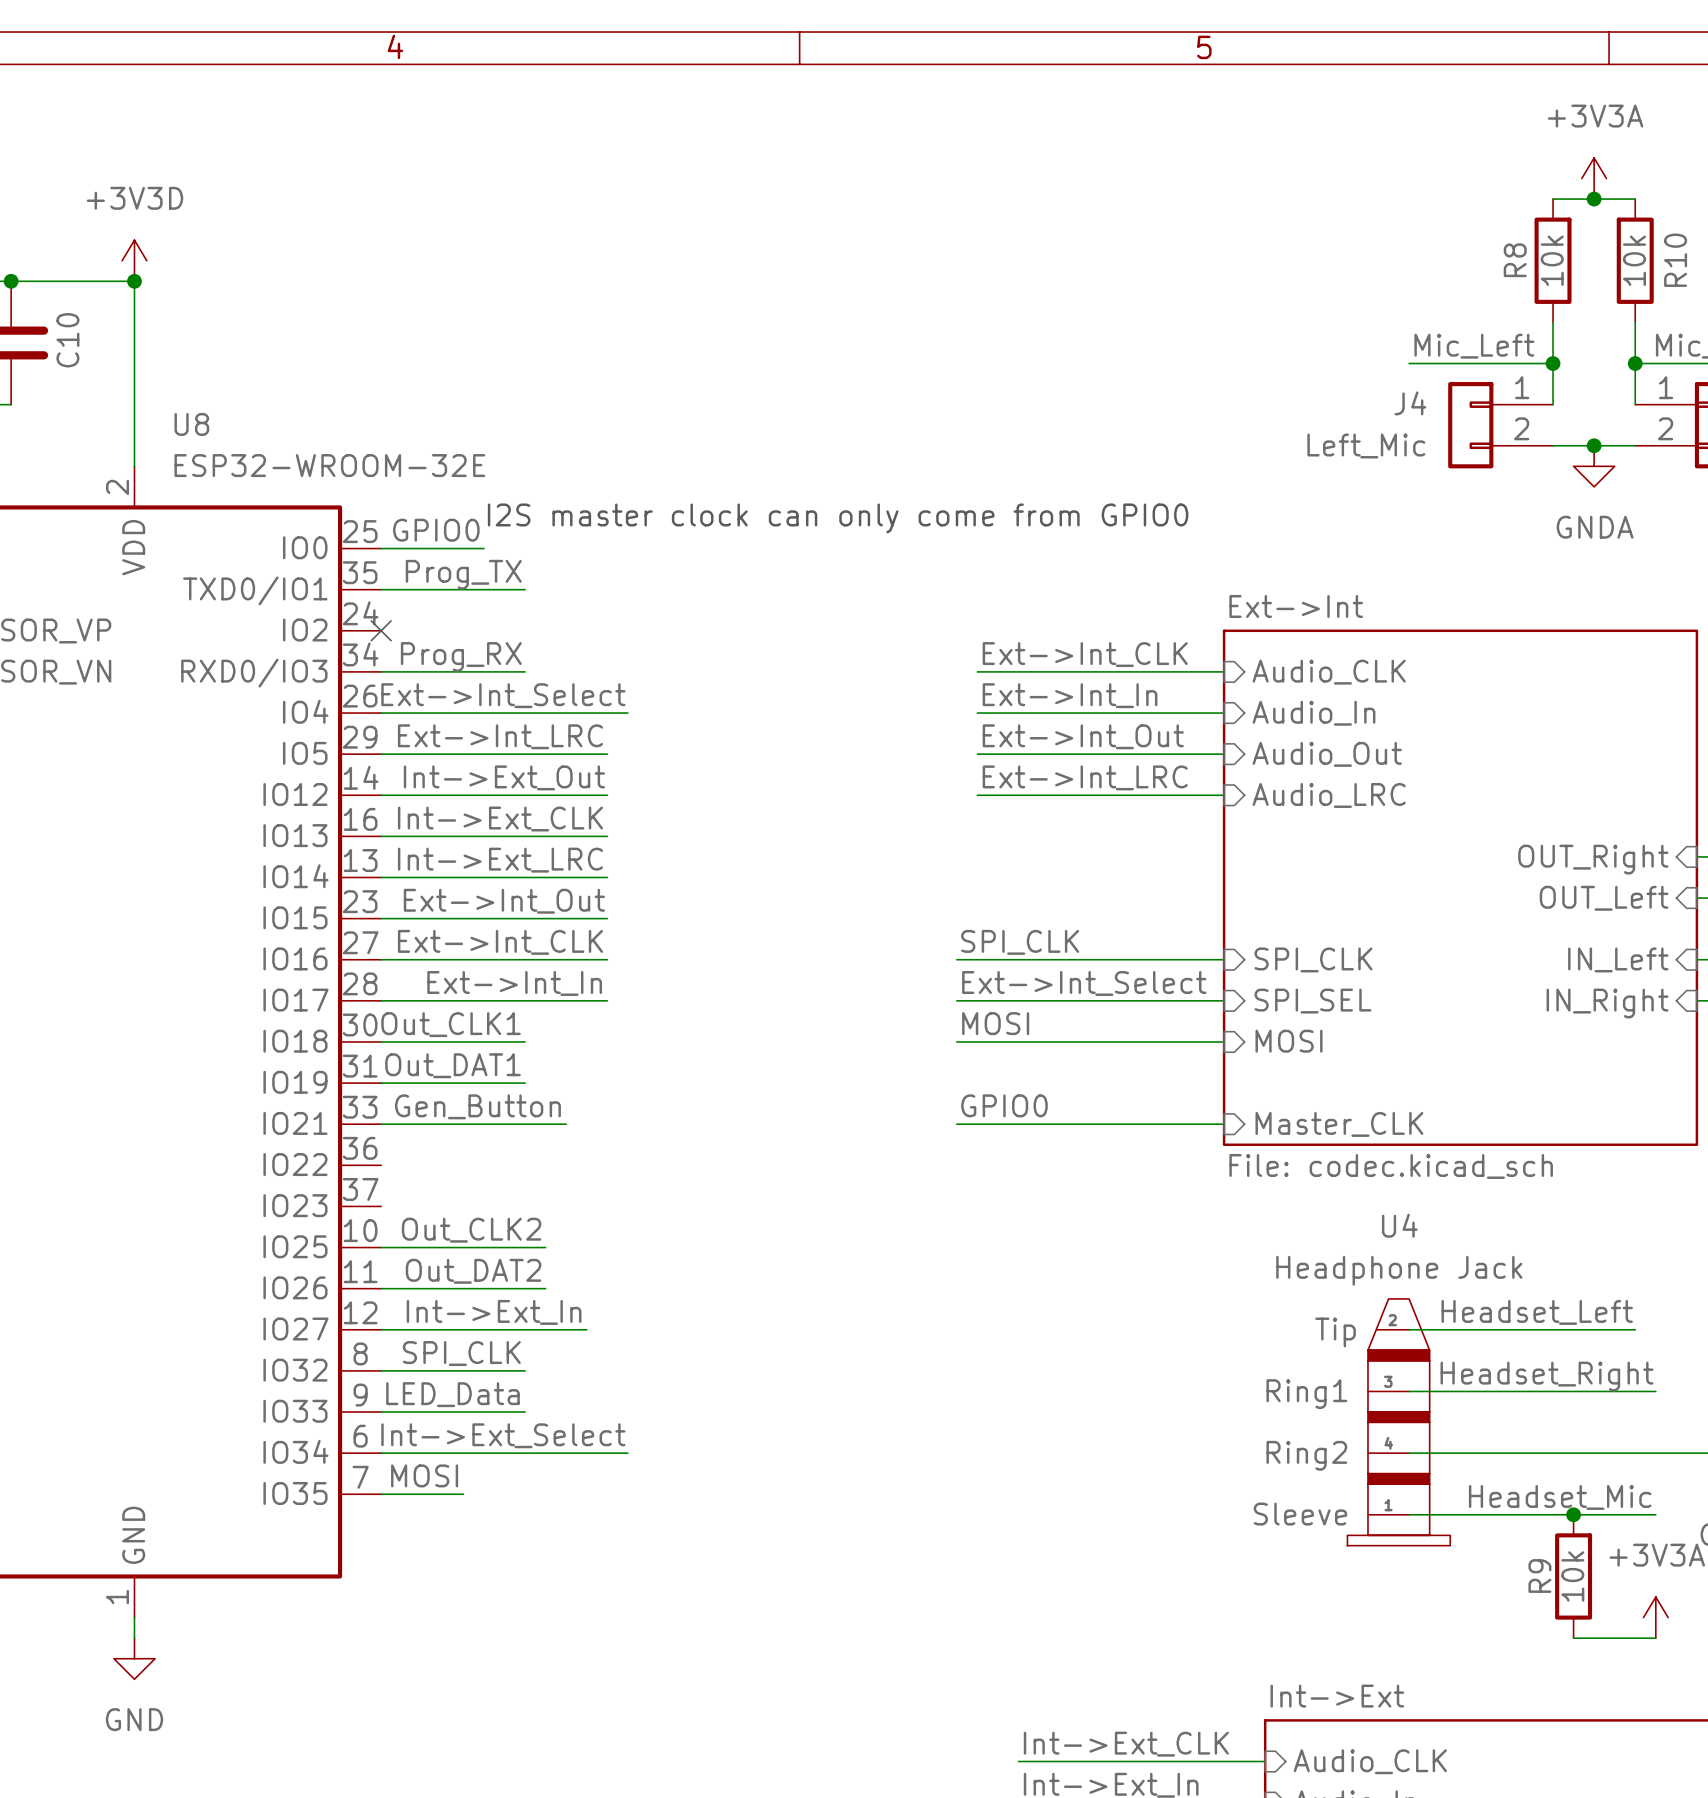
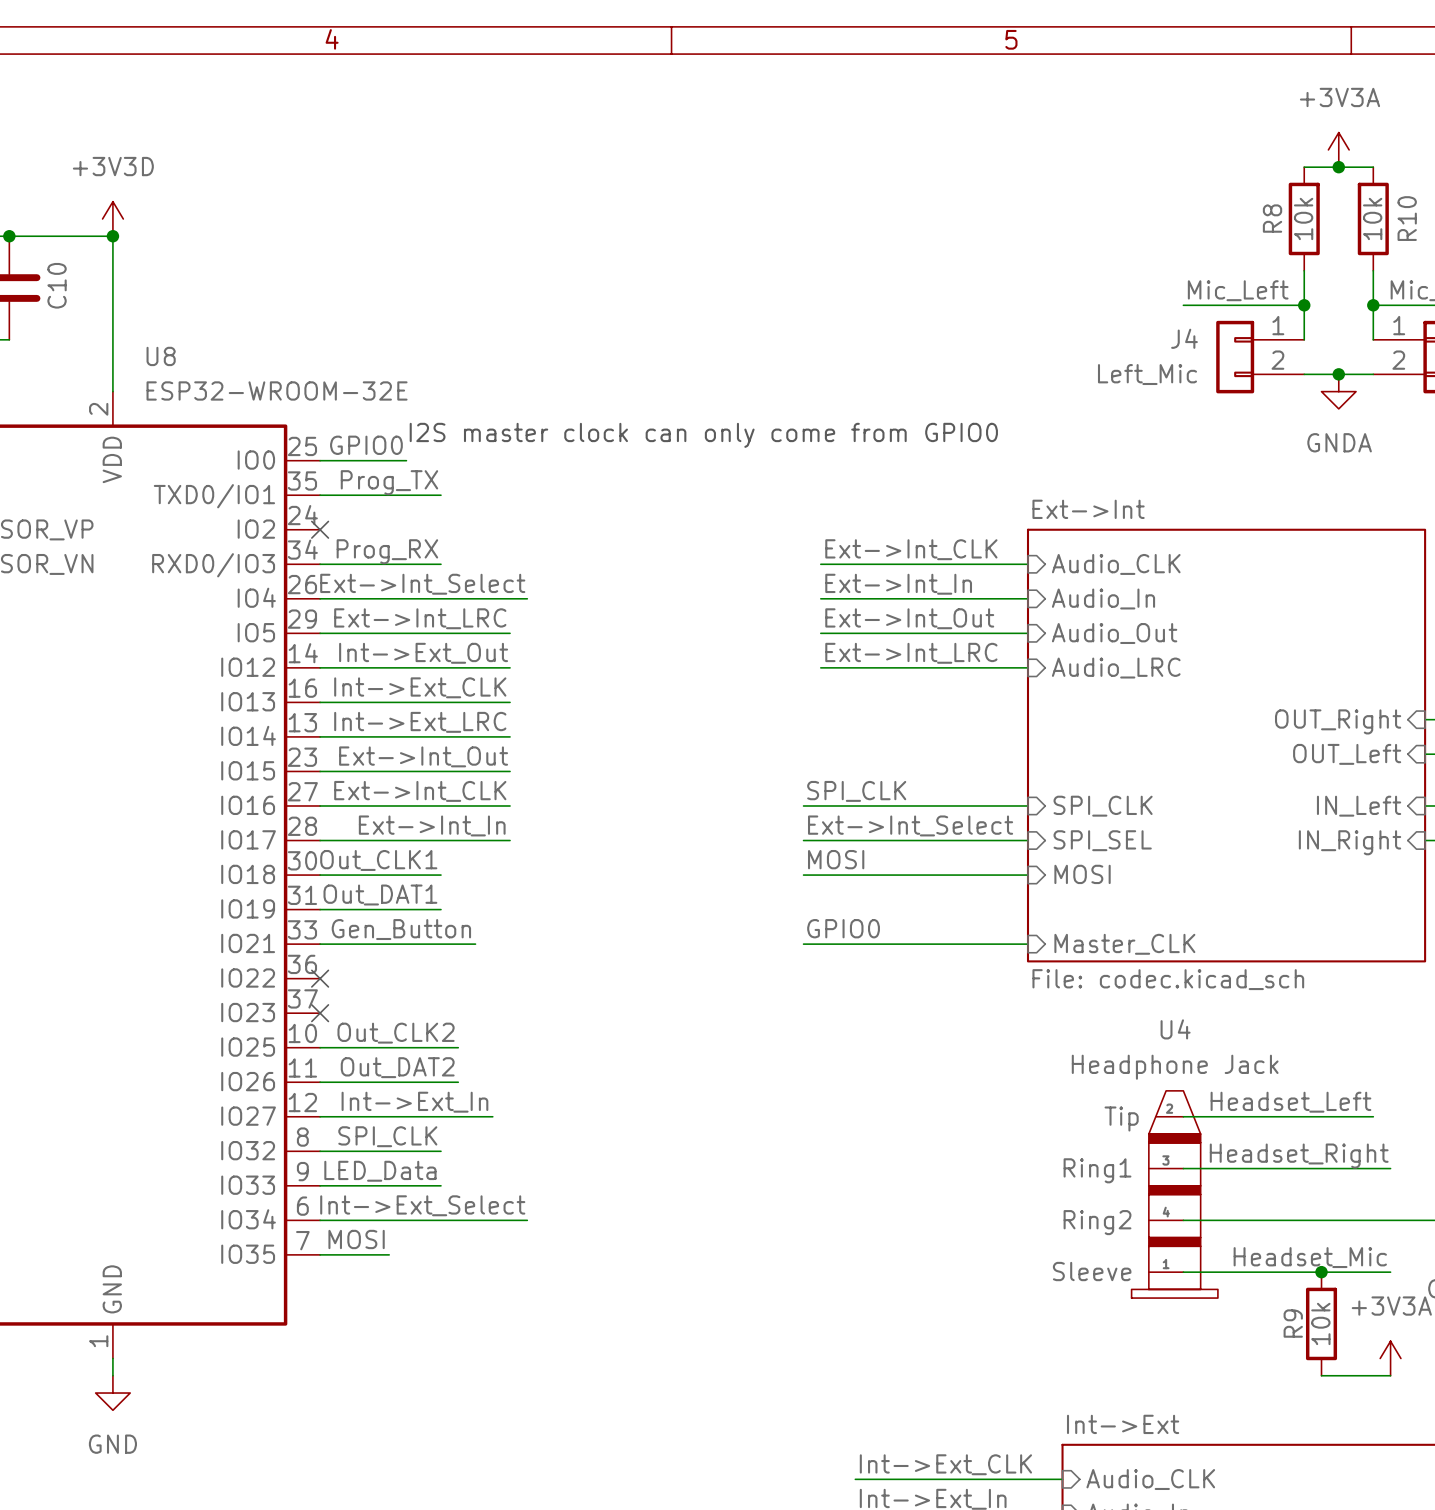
no-connect mark: none -> (320, 978)
no-connect mark: none -> (320, 1013)

